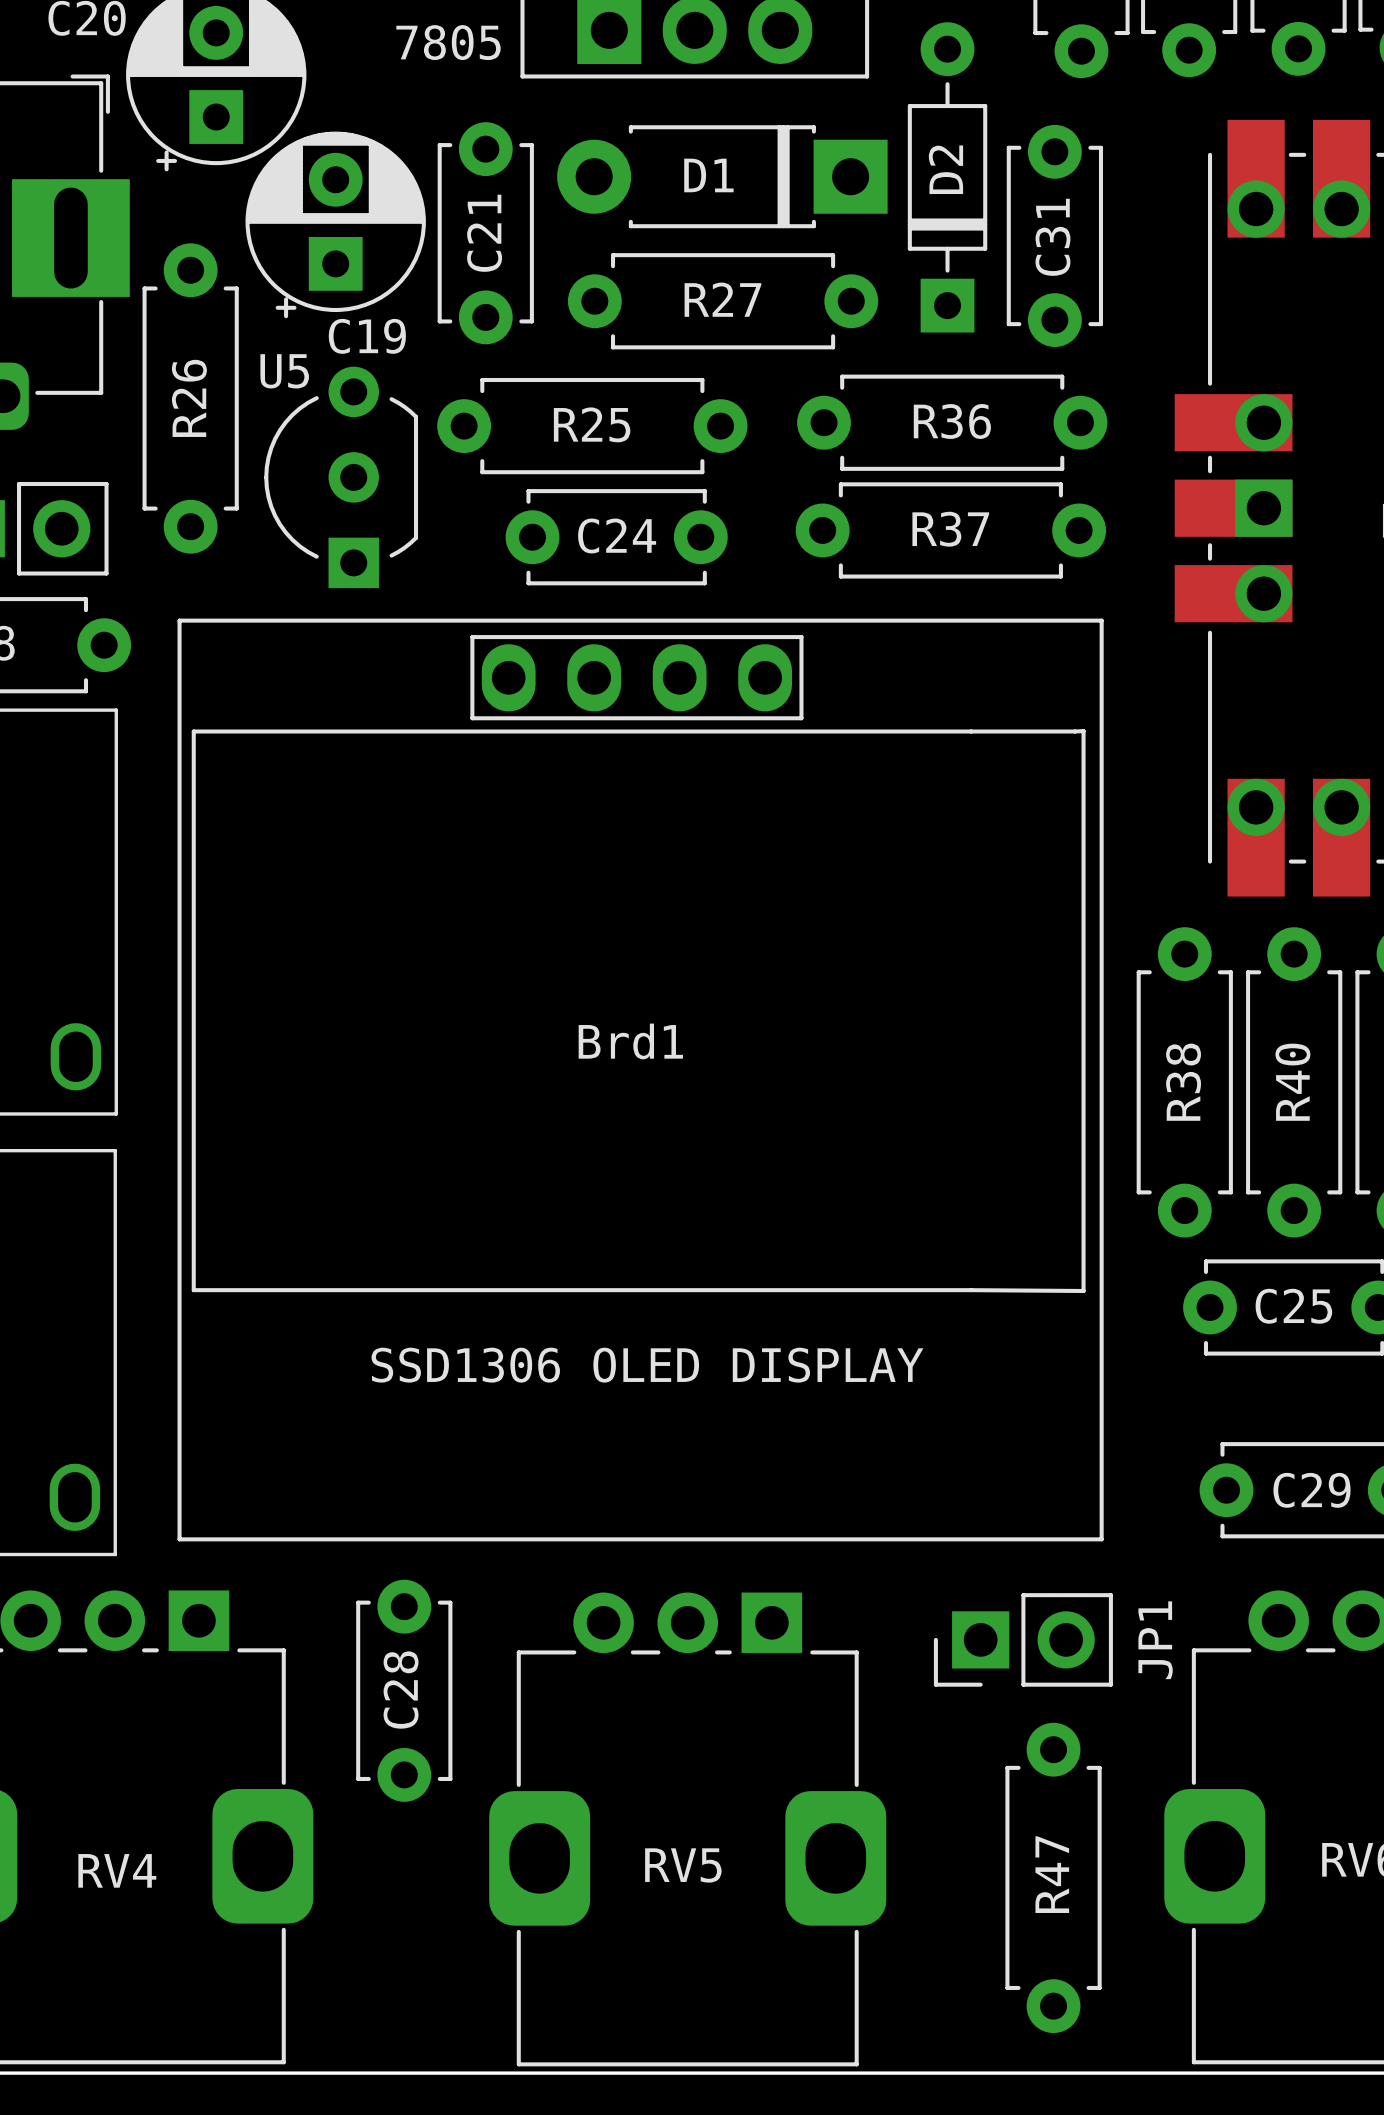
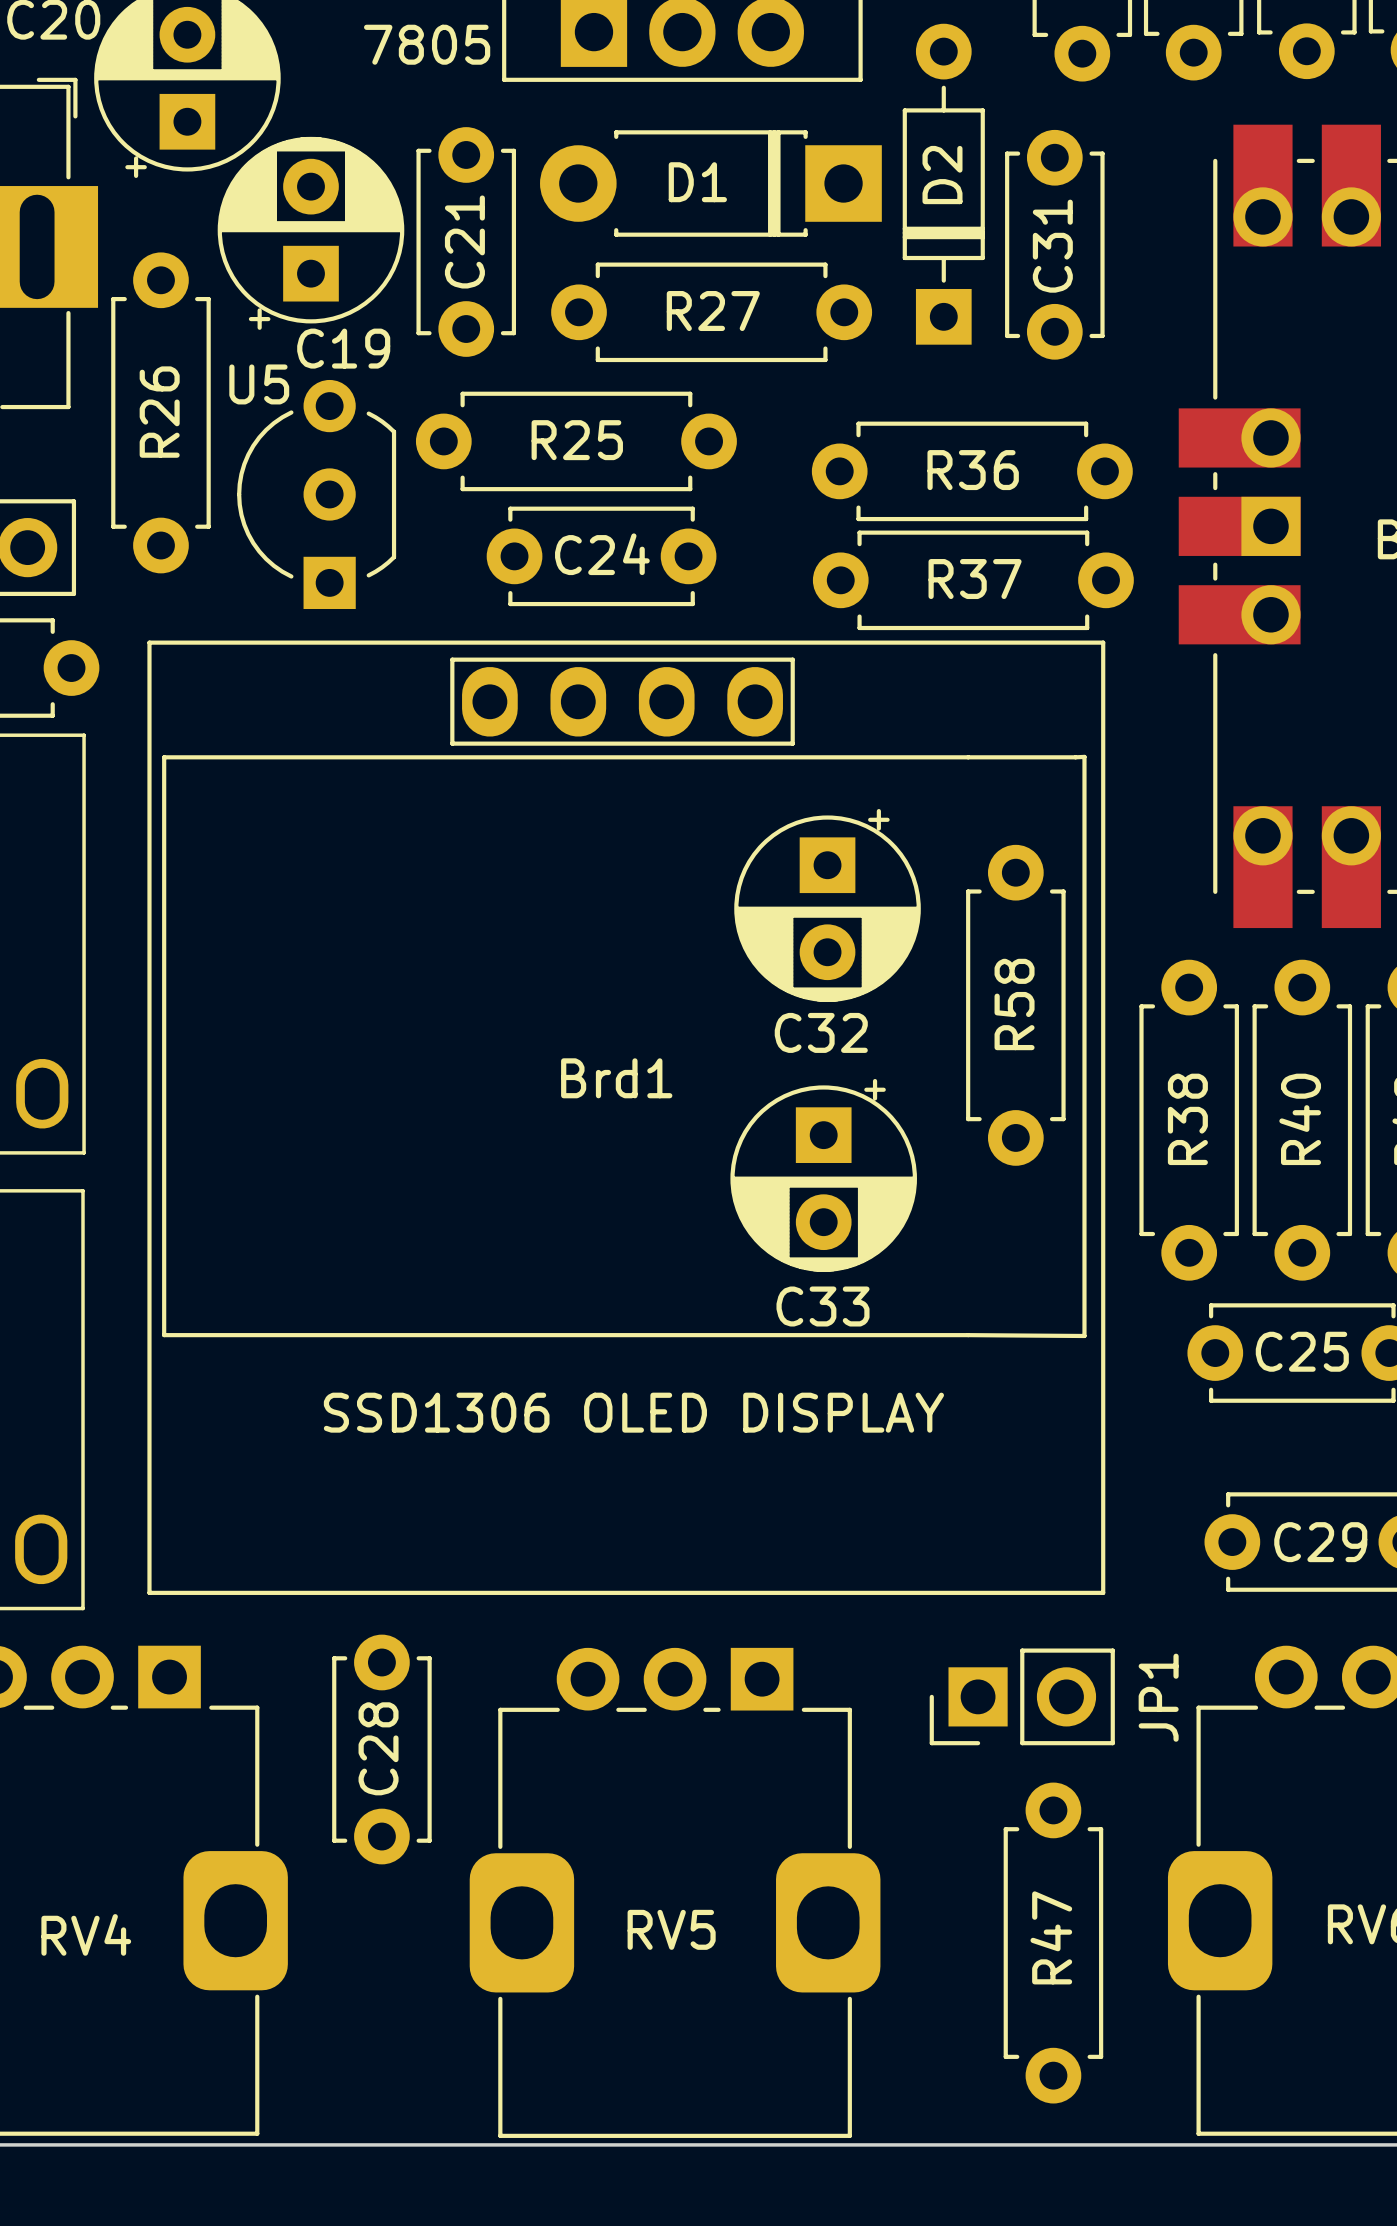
R36 position: (952, 422) -> (972, 471)
R37 position: (950, 530) -> (973, 580)
C32: none -> (827, 905)
R58: none -> (1015, 1005)
C33: none -> (823, 1175)

